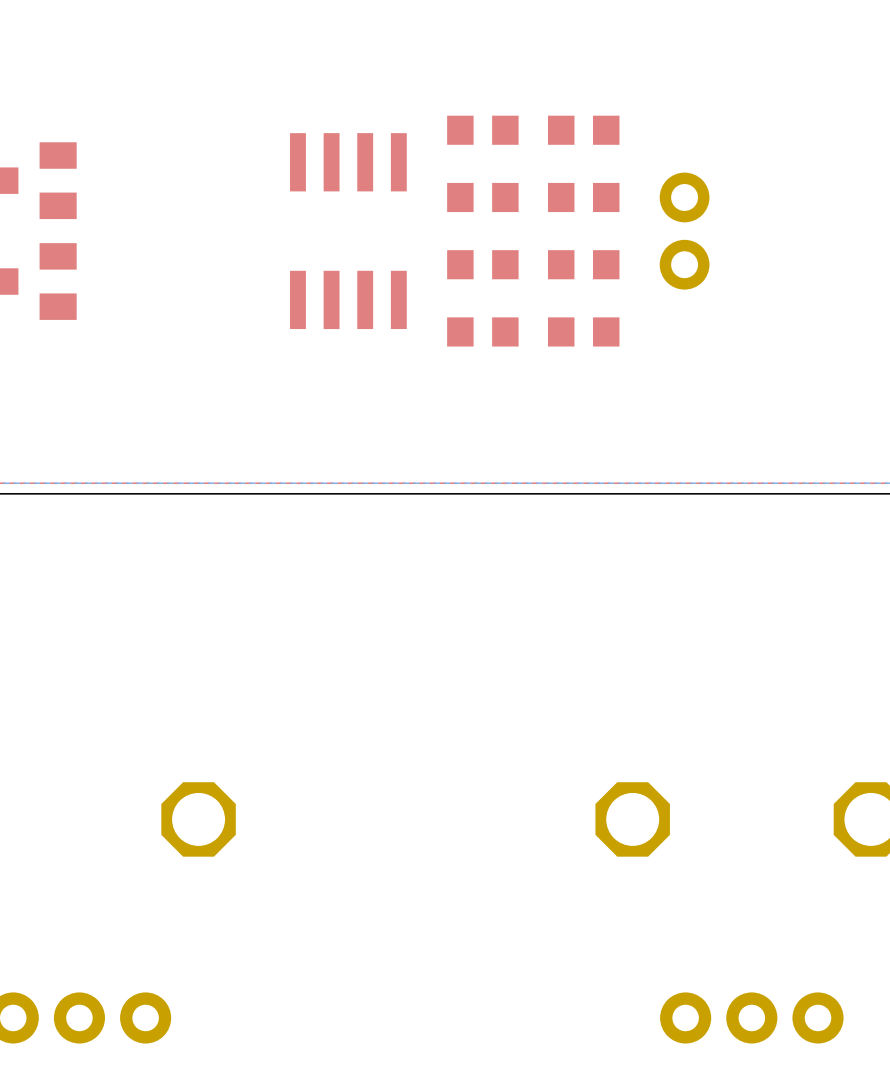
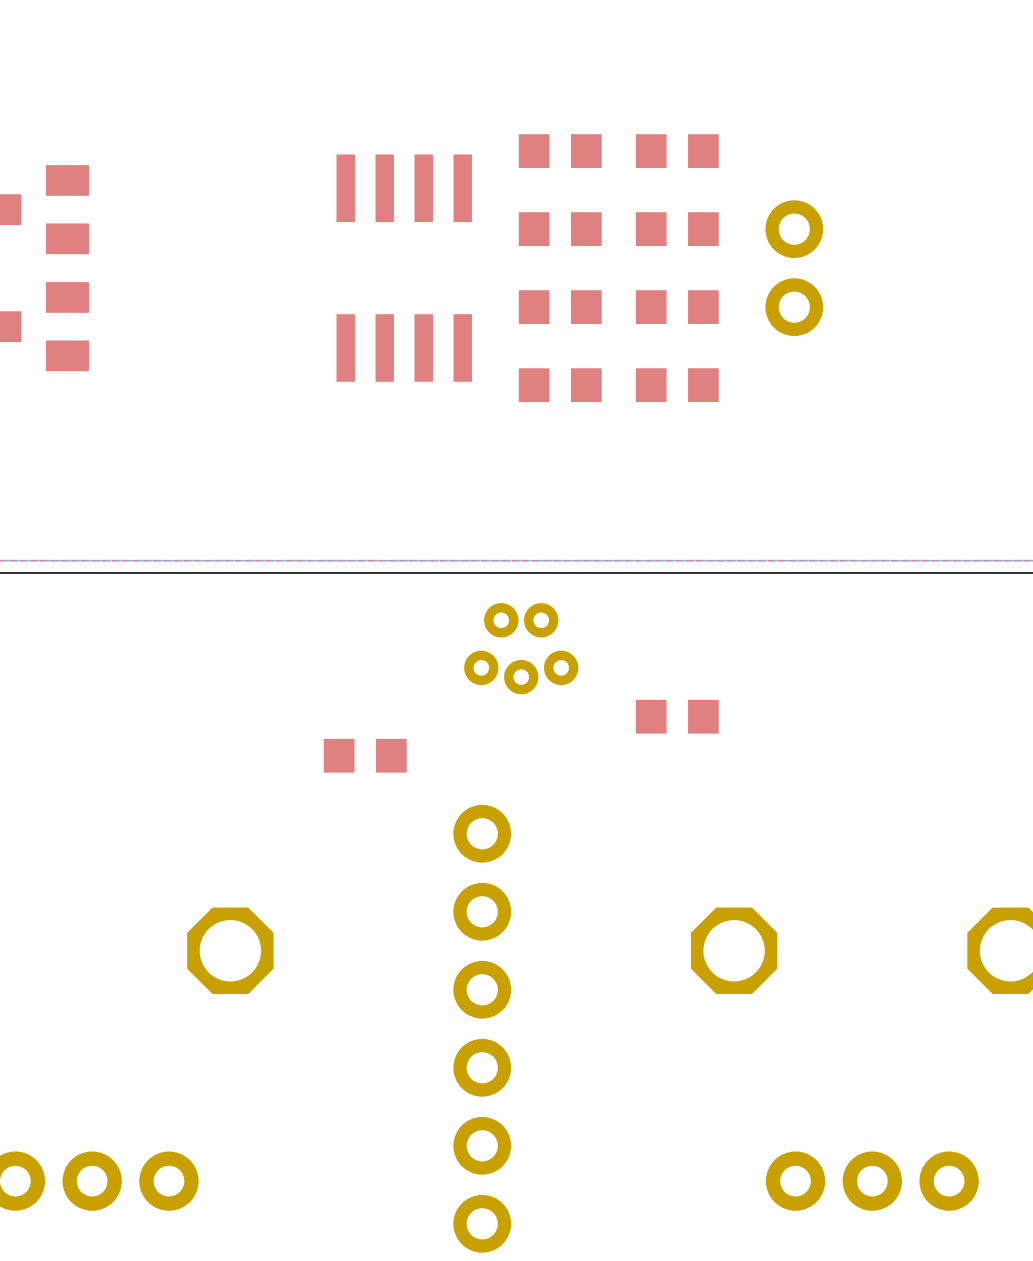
part: none -> (521, 648)
part: none -> (677, 716)
part: none -> (365, 755)
part: none -> (482, 1028)

